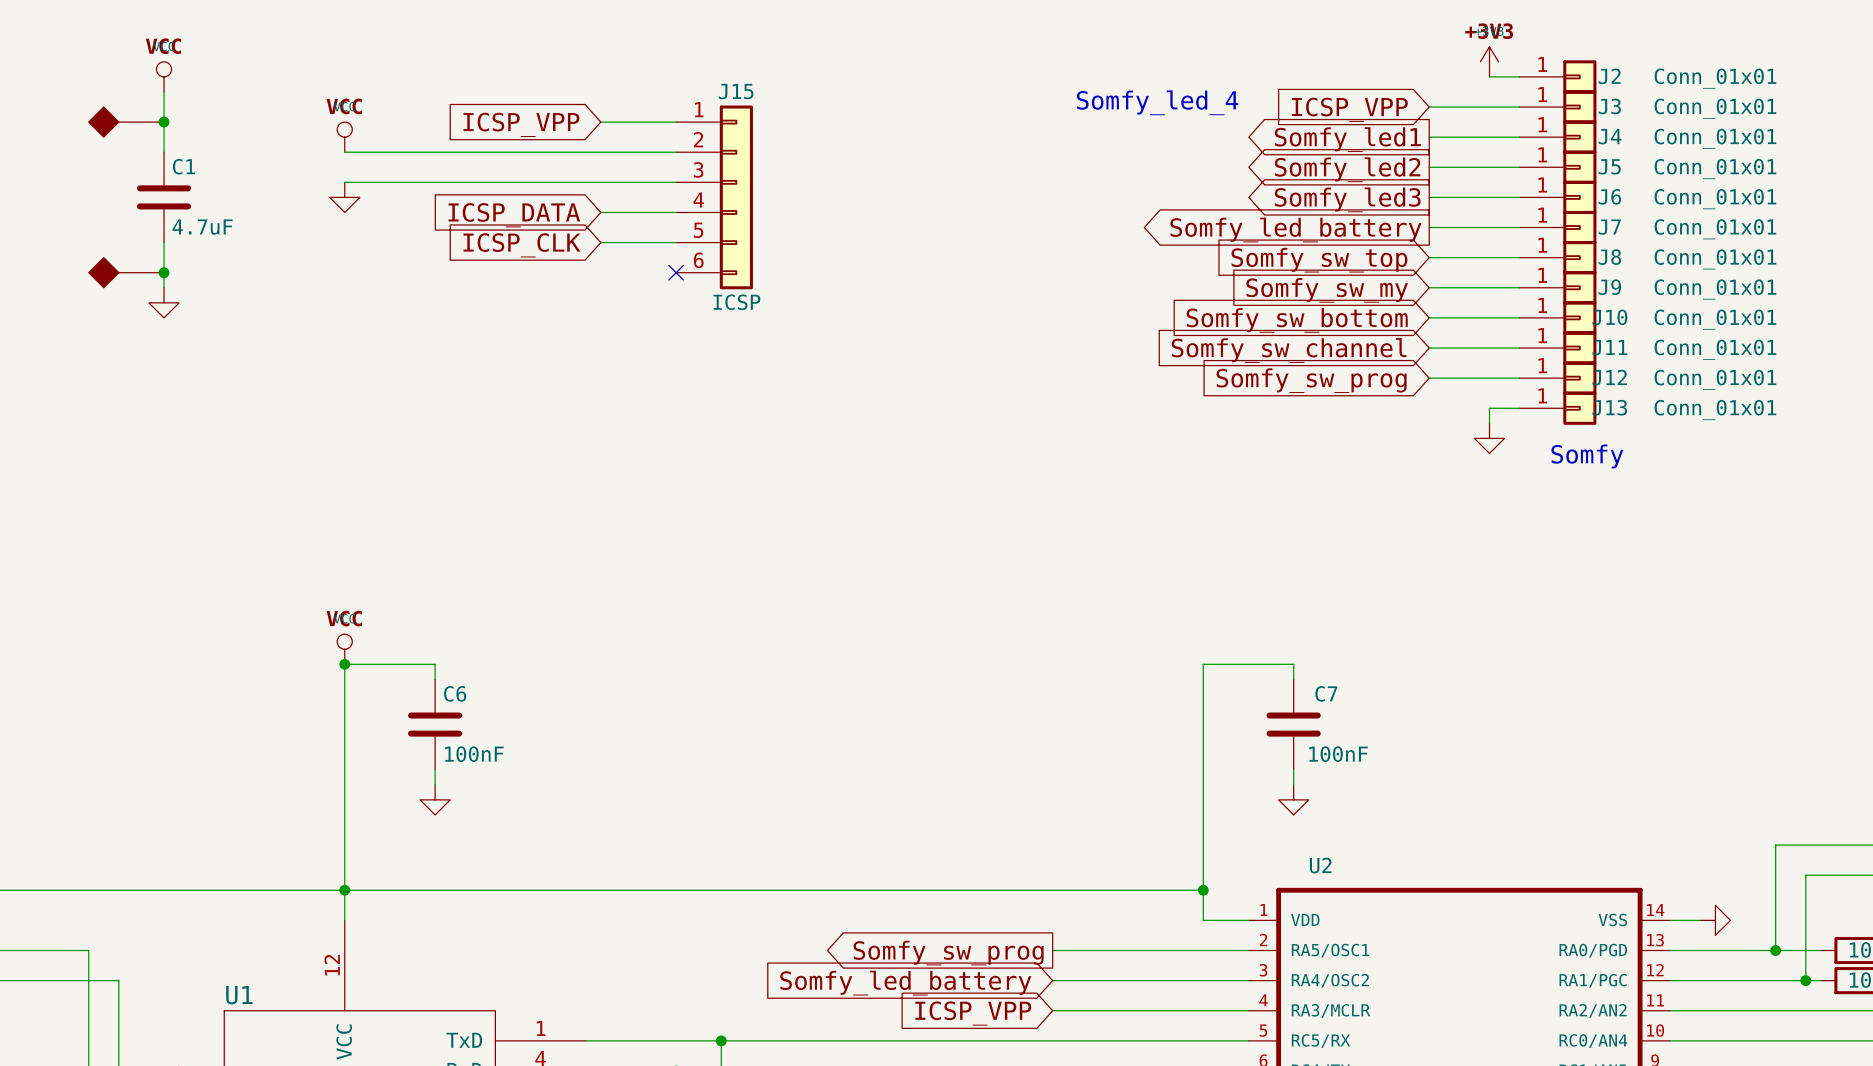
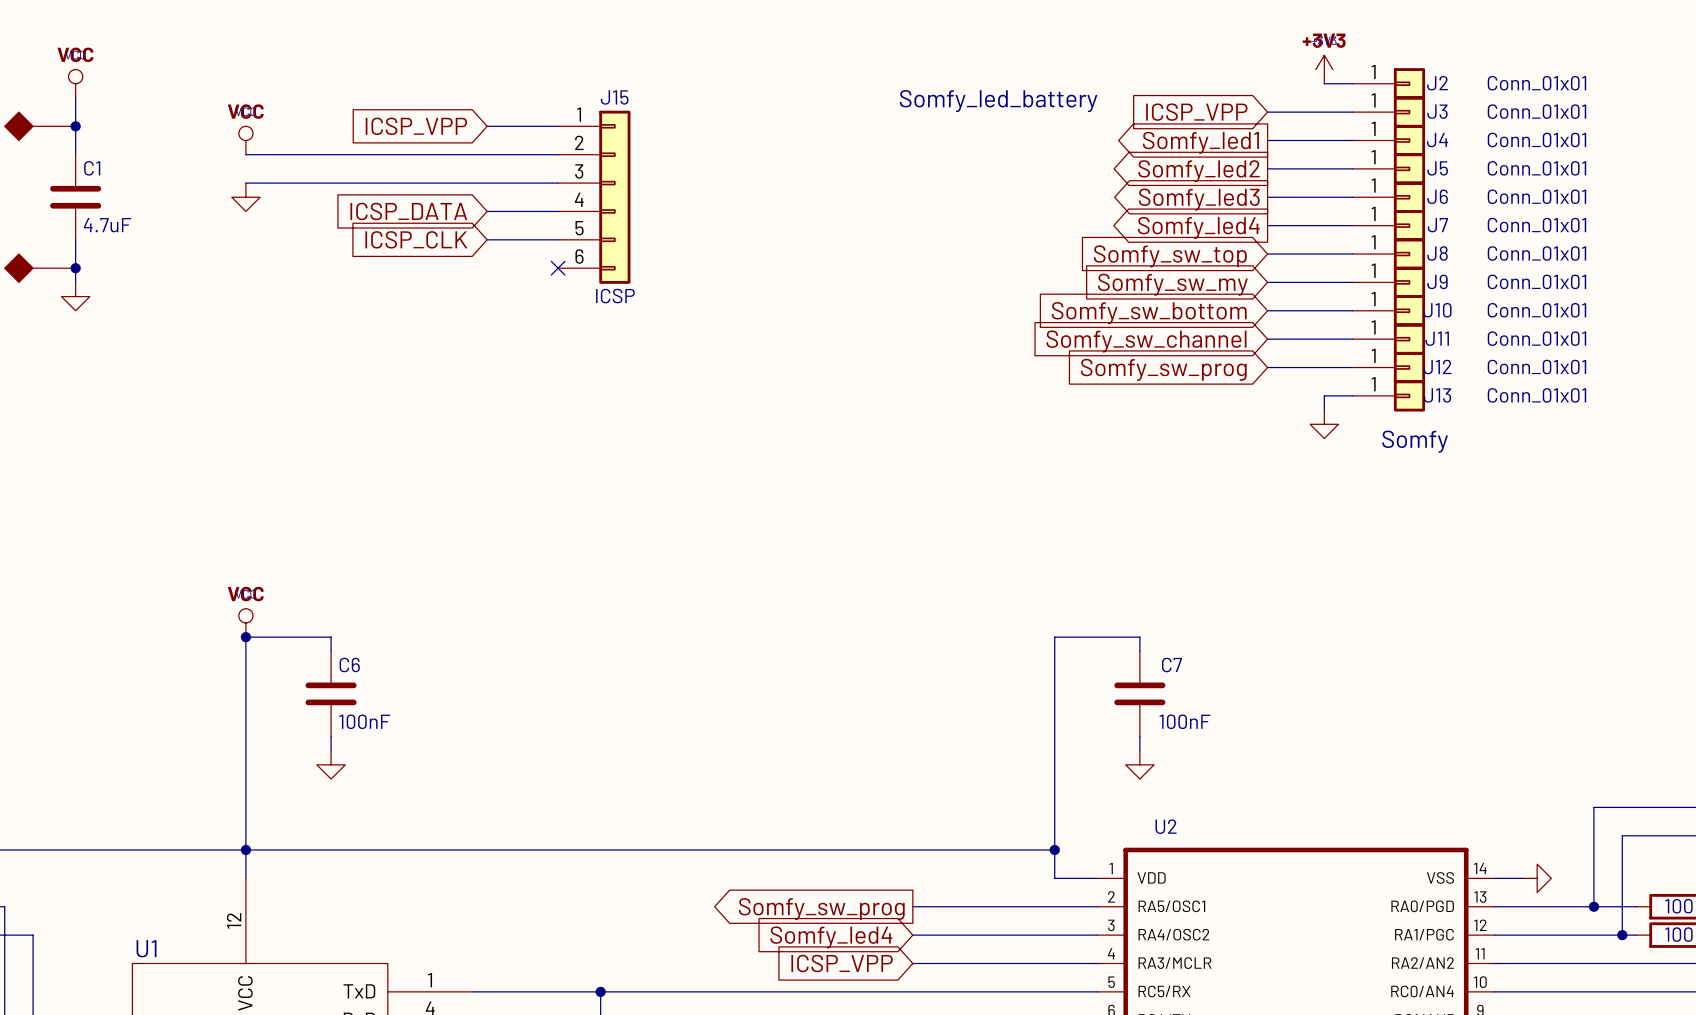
text: Somfy_led_4 (1157, 102) -> Somfy_led_battery (998, 101)
global label: Somfy_led_battery (1295, 230) -> Somfy_led4 (1198, 227)
global label: Somfy_led_battery (905, 983) -> Somfy_led4 (831, 937)

